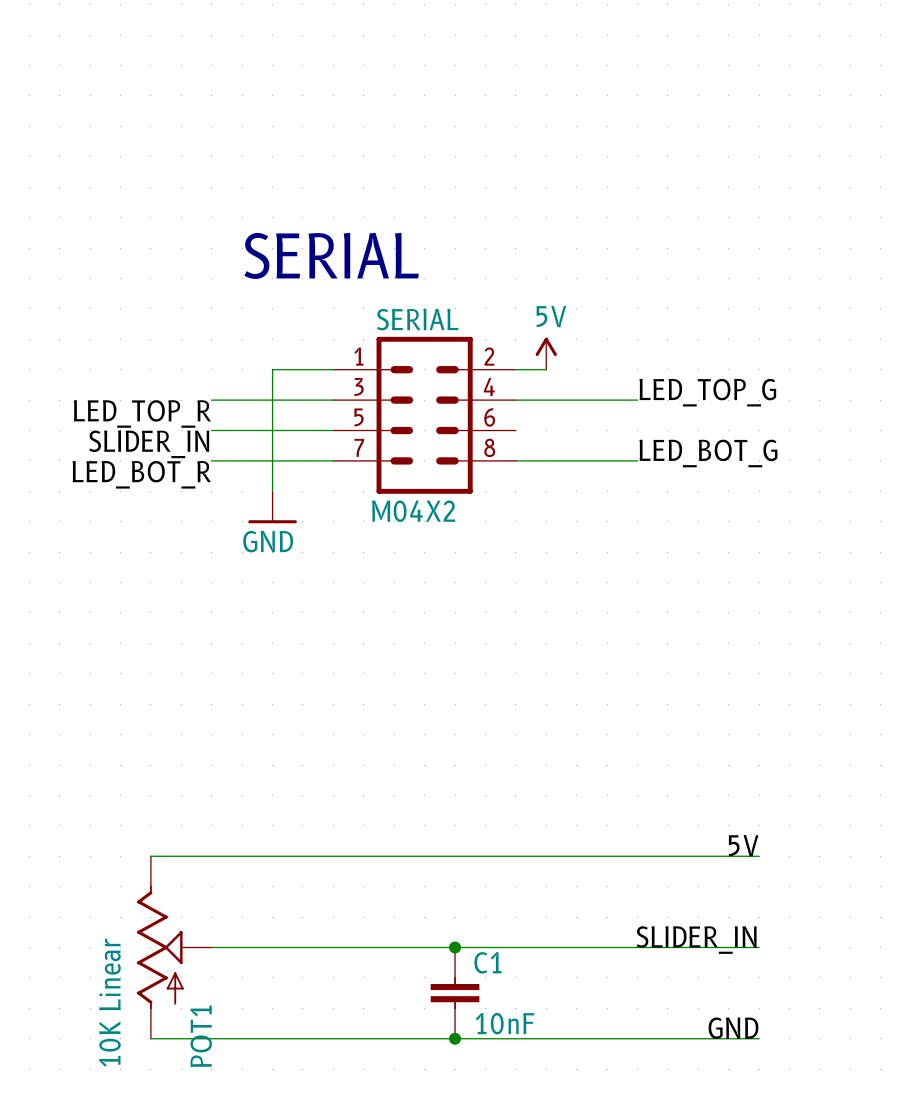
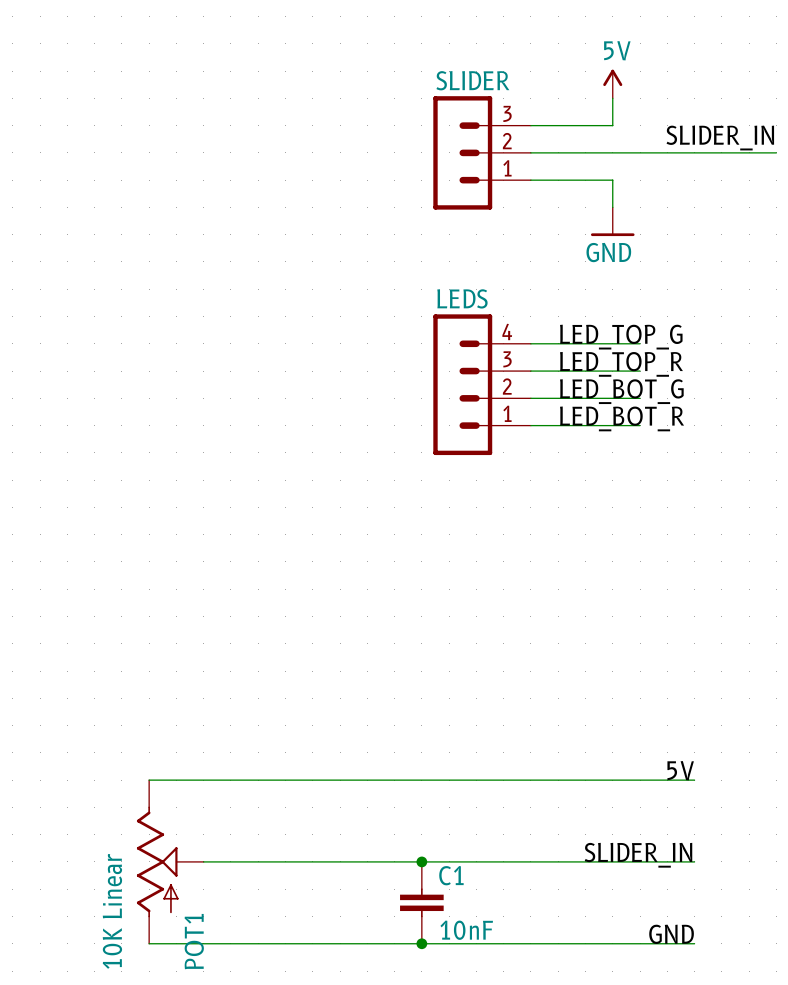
power symbol: none -> 5V (612, 84)
wire: none -> (612, 98) (612, 125) (530, 125)
label: none -> SLIDER_IN (720, 138)
SLIDER: none -> (482, 152)
wire: none -> (530, 152) (776, 152)
wire: none -> (530, 180) (612, 180) (612, 207)
power symbol: none -> GND (612, 221)
text: SERIAL (331, 255) -> none
power symbol: 5V (546, 353) -> none
wire: (333, 369) (272, 369) (272, 491) -> none
wire: none -> (530, 343) (640, 343)
label: none -> LED_TOP_R (621, 364)
label position: LED_TOP_G (707, 392) -> LED_TOP_G (621, 337)
wire: (211, 400) (333, 400) -> none
label: LED_TOP_R (142, 413) -> none
SERIAL: M04X2 (424, 415) -> none
LEDS: none -> (482, 384)
wire: (211, 430) (333, 430) -> none
wire: none -> (530, 398) (640, 398)
label: SLIDER_IN (149, 444) -> none
label: none -> LED_BOT_R (622, 418)
label position: LED_BOT_G (708, 453) -> LED_BOT_G (621, 391)
wire: (211, 460) (333, 460) -> none
label: LED_BOT_R (141, 474) -> none
power symbol: GND (272, 507) -> none

